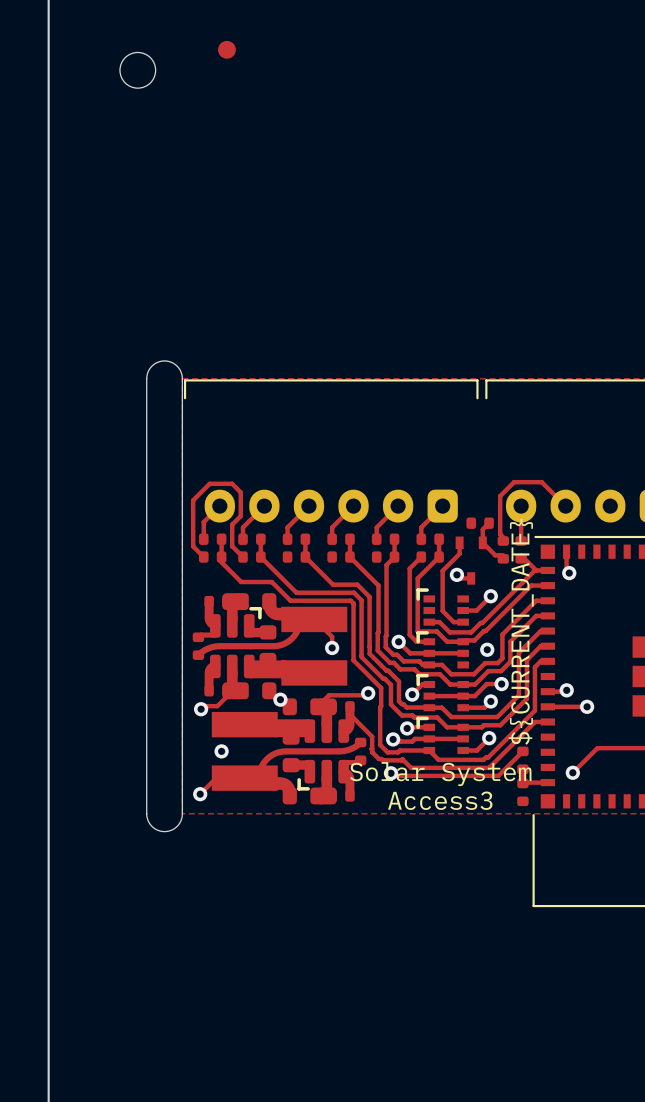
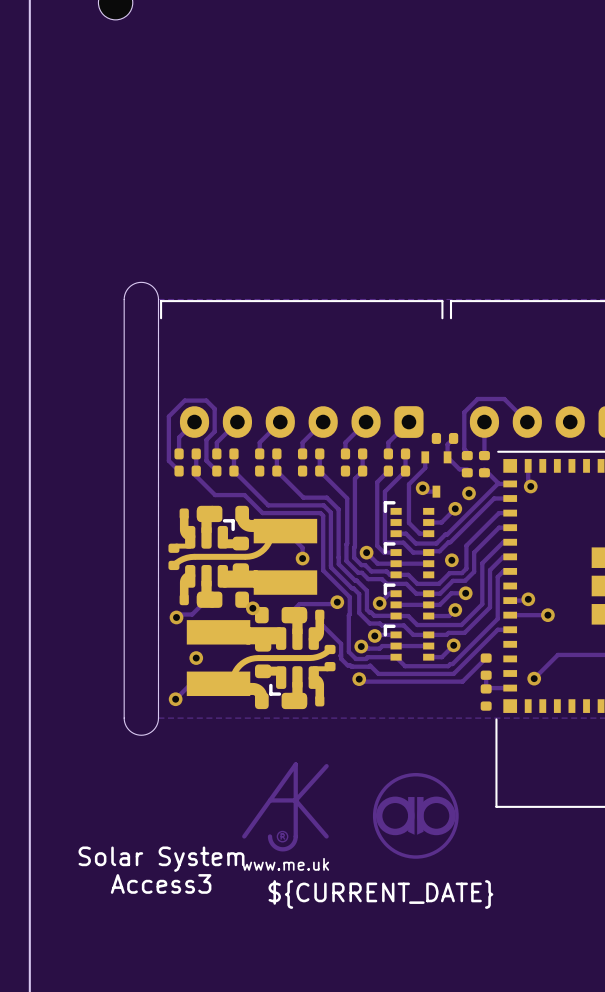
via: none -> (469, 493)
text rotation: 0° (521, 631) -> 90° clockwise (380, 894)
text position: ${CURRENT_DATE} (521, 631) -> ${CURRENT_DATE} (380, 894)
text position: Solar System (440, 774) -> Solar System (161, 859)
text position: Access3 (440, 800) -> Access3 (161, 883)
drawing: none -> [242, 762, 329, 852]
drawing: none -> [372, 772, 459, 859]

